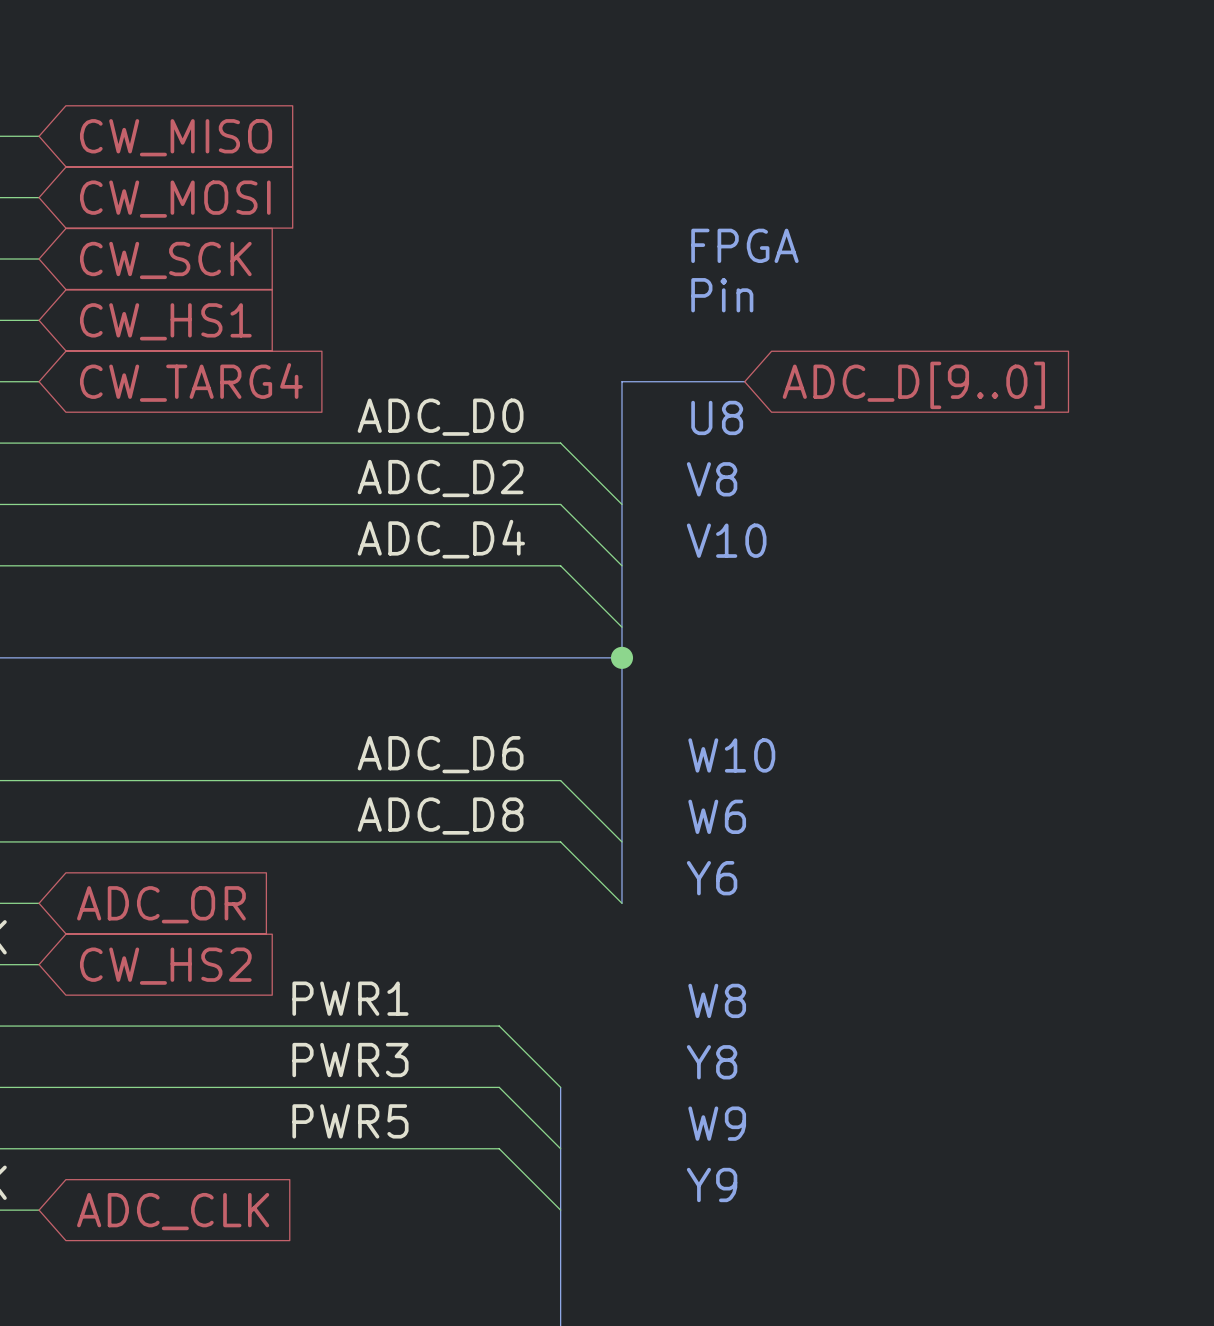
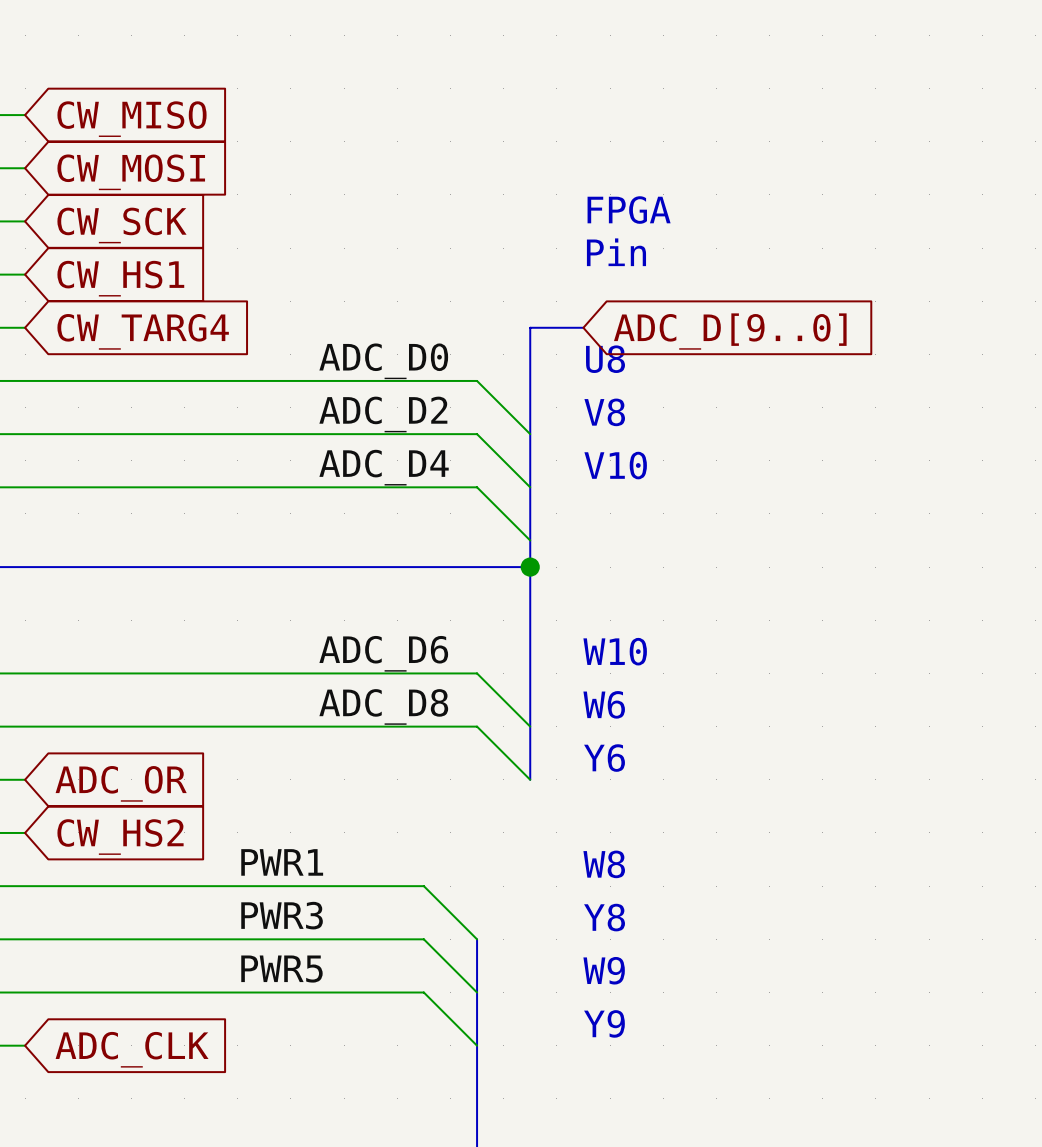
bus: (683, 381) (744, 381) -> none
global label position: ADC_D[9..0] (913, 385) -> ADC_D[9..0] (730, 331)

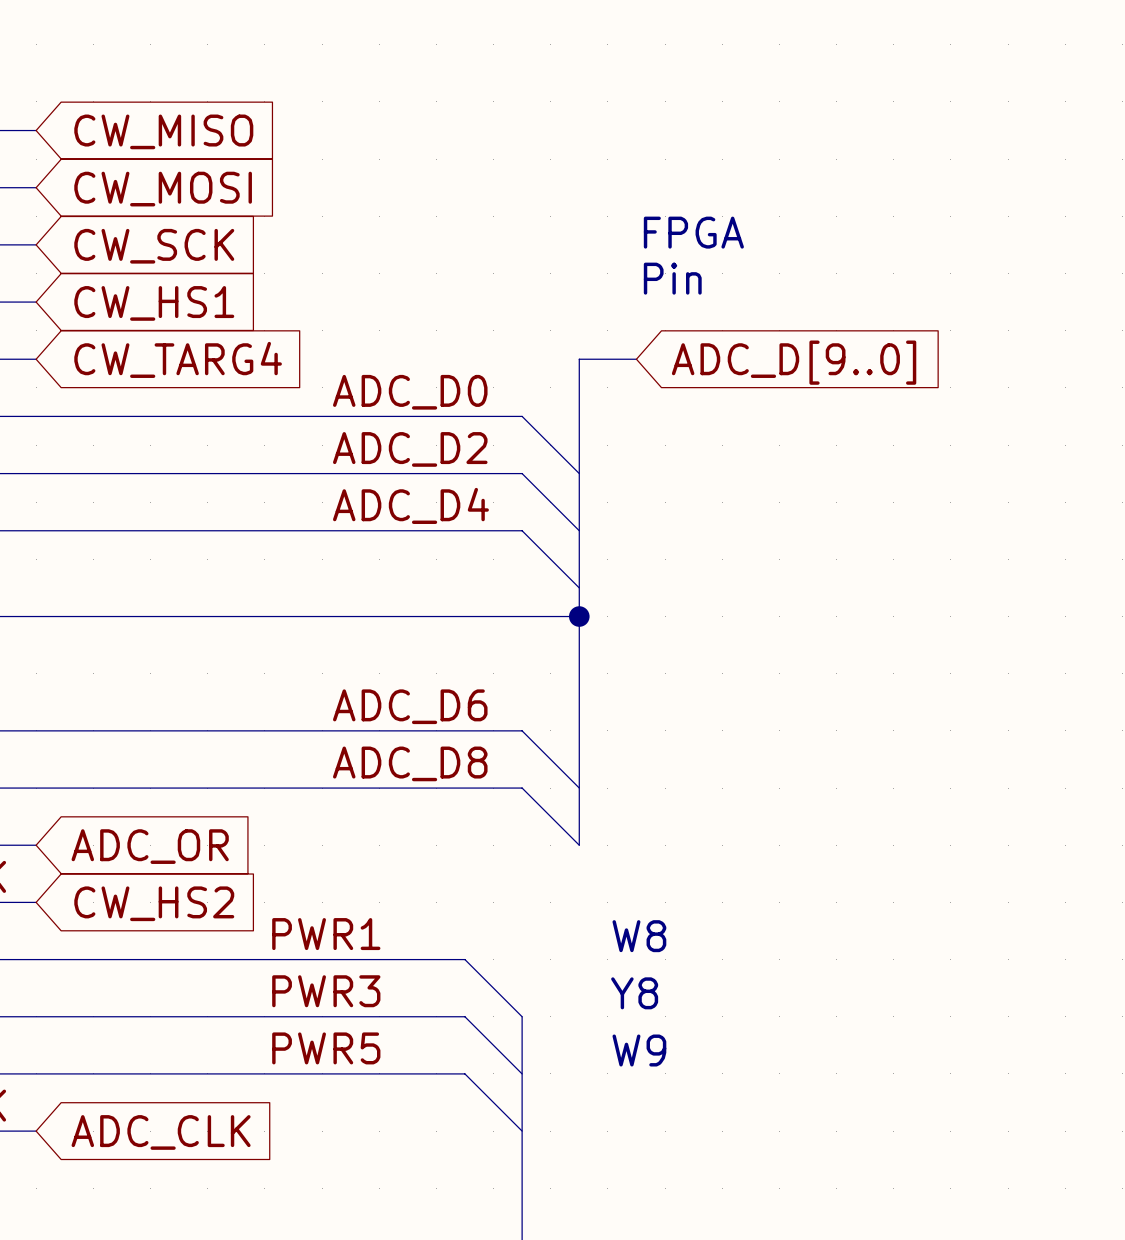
text: U8 (605, 359) -> none
text: V8 (604, 412) -> none
text: V10 (615, 465) -> none
text: W10 (615, 651) -> none
text: W6 (604, 704) -> none
text: Y6 (604, 758) -> none
text position: W8 (604, 864) -> W8 (639, 936)
text position: Y8 (604, 917) -> Y8 (634, 993)
text position: W9 (604, 970) -> W9 (639, 1050)
text: Y9 (604, 1023) -> none

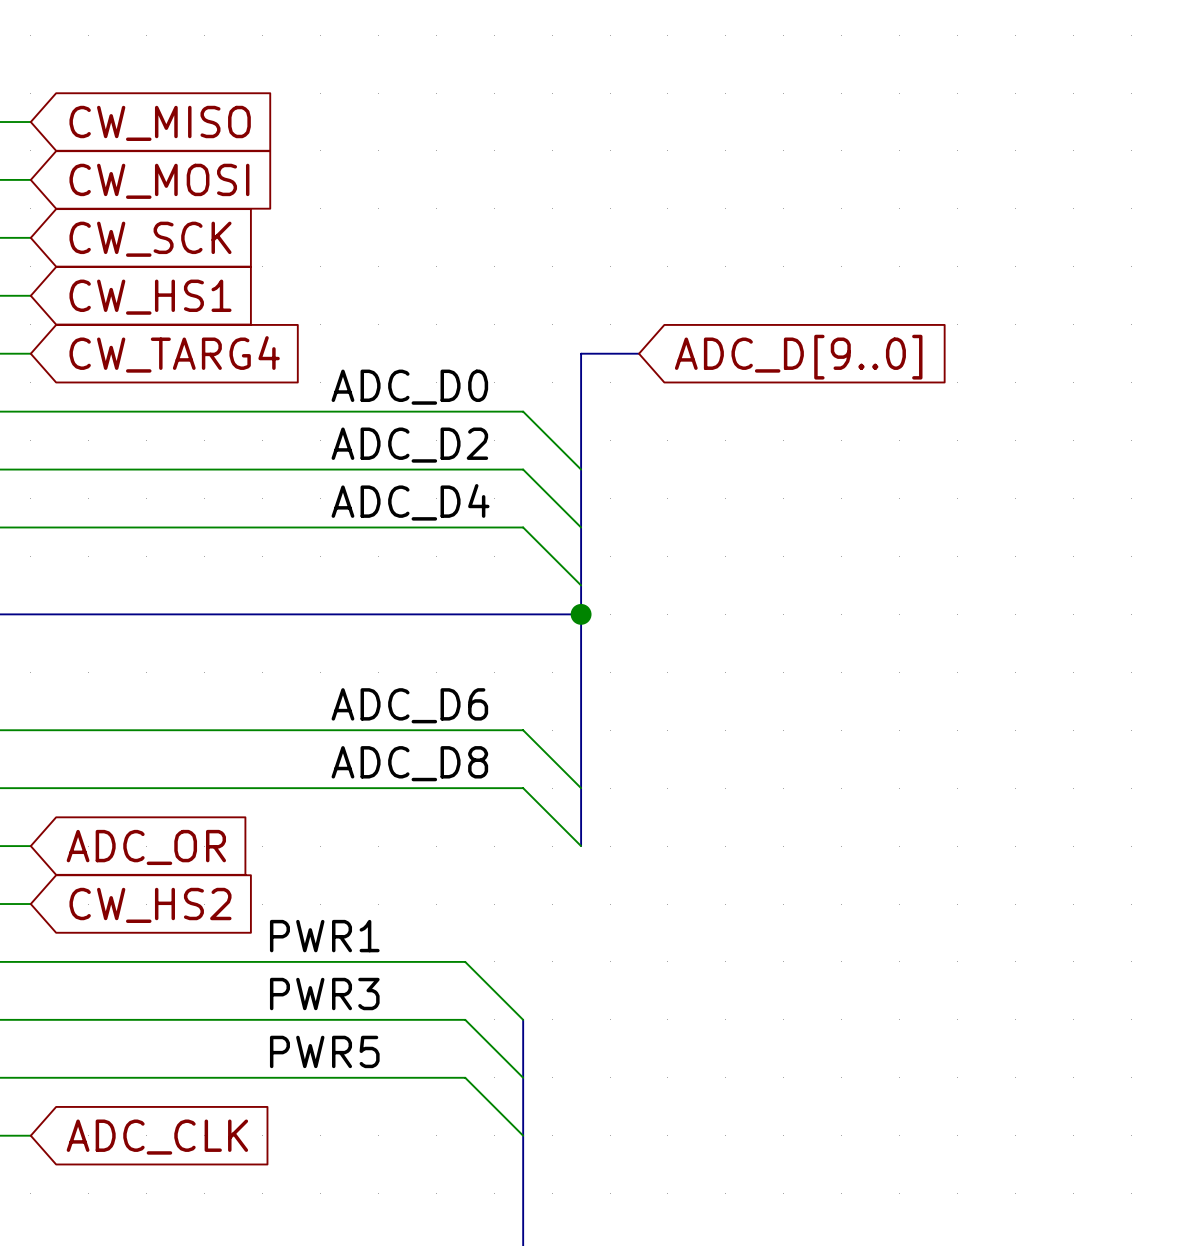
text: FPGA (693, 232) -> none
text: Pin (672, 278) -> none
text: W8 (639, 936) -> none
text: Y8 (634, 993) -> none
text: W9 (639, 1050) -> none

